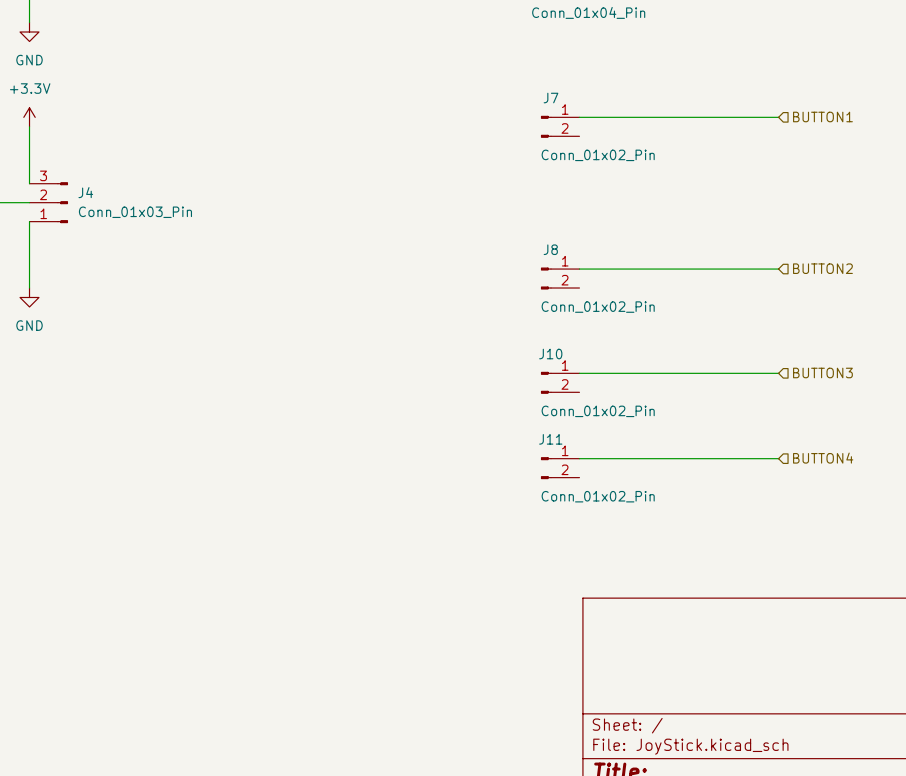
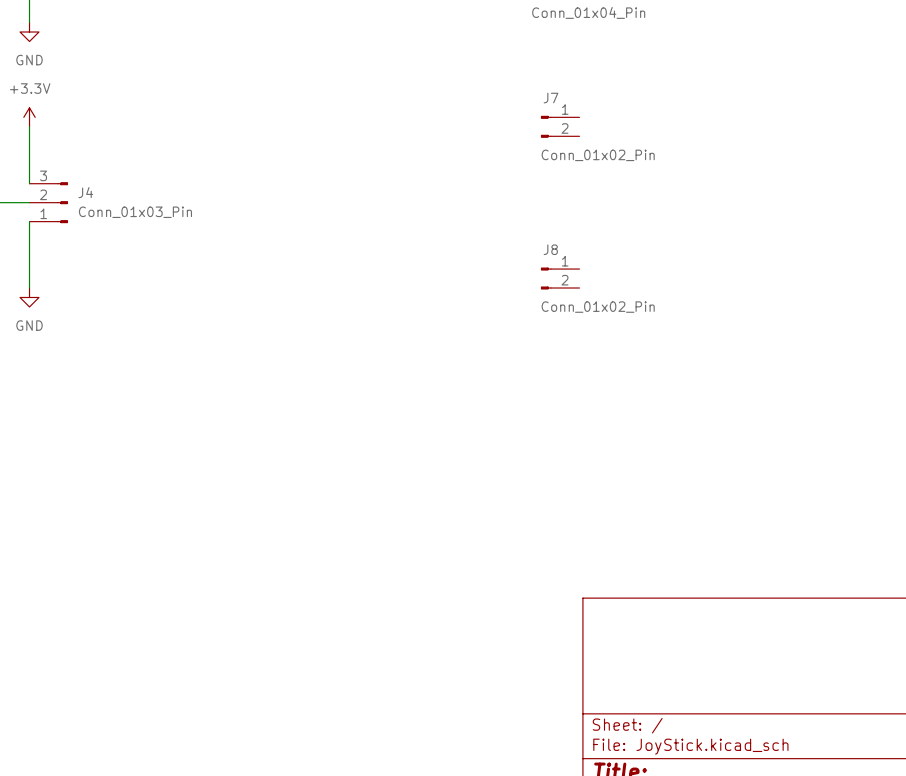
hierarchical label: BUTTON1 (822, 116) -> none
wire: (579, 117) (778, 117) -> none
hierarchical label: BUTTON2 (822, 268) -> none
wire: (579, 269) (778, 269) -> none
hierarchical label: BUTTON3 (822, 372) -> none
wire: (579, 373) (778, 373) -> none
J10: Conn_01x02_Pin (560, 382) -> none
wire: (579, 458) (778, 458) -> none
hierarchical label: BUTTON4 (823, 458) -> none
J11: Conn_01x02_Pin (560, 468) -> none

